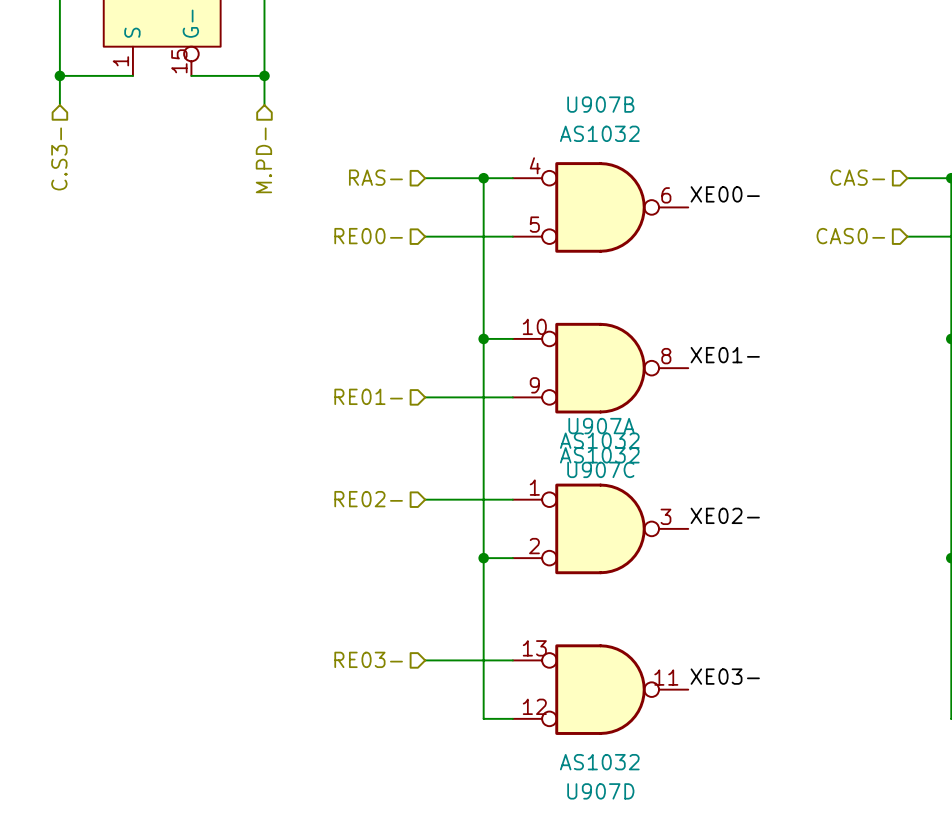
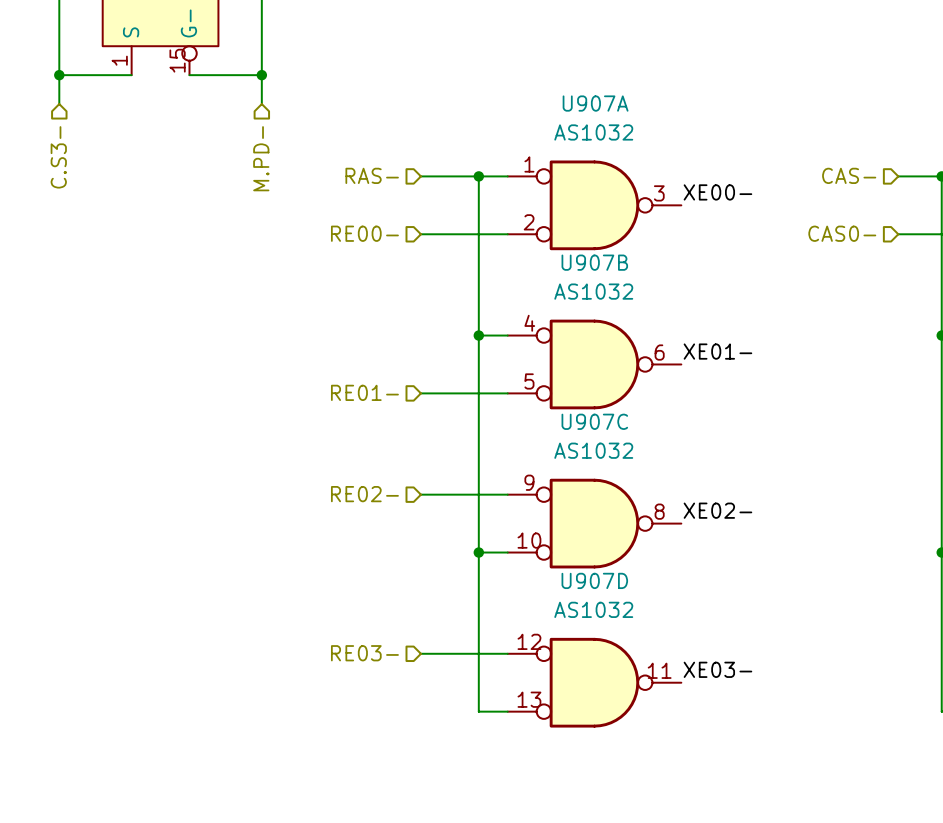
U907B position: (600, 207) -> (594, 364)
U907C flip: as is (600, 368) -> up-down (594, 523)
U907C position: (600, 368) -> (594, 523)
U907A position: (600, 528) -> (594, 205)
U907D flip: as is (600, 689) -> up-down (594, 682)

